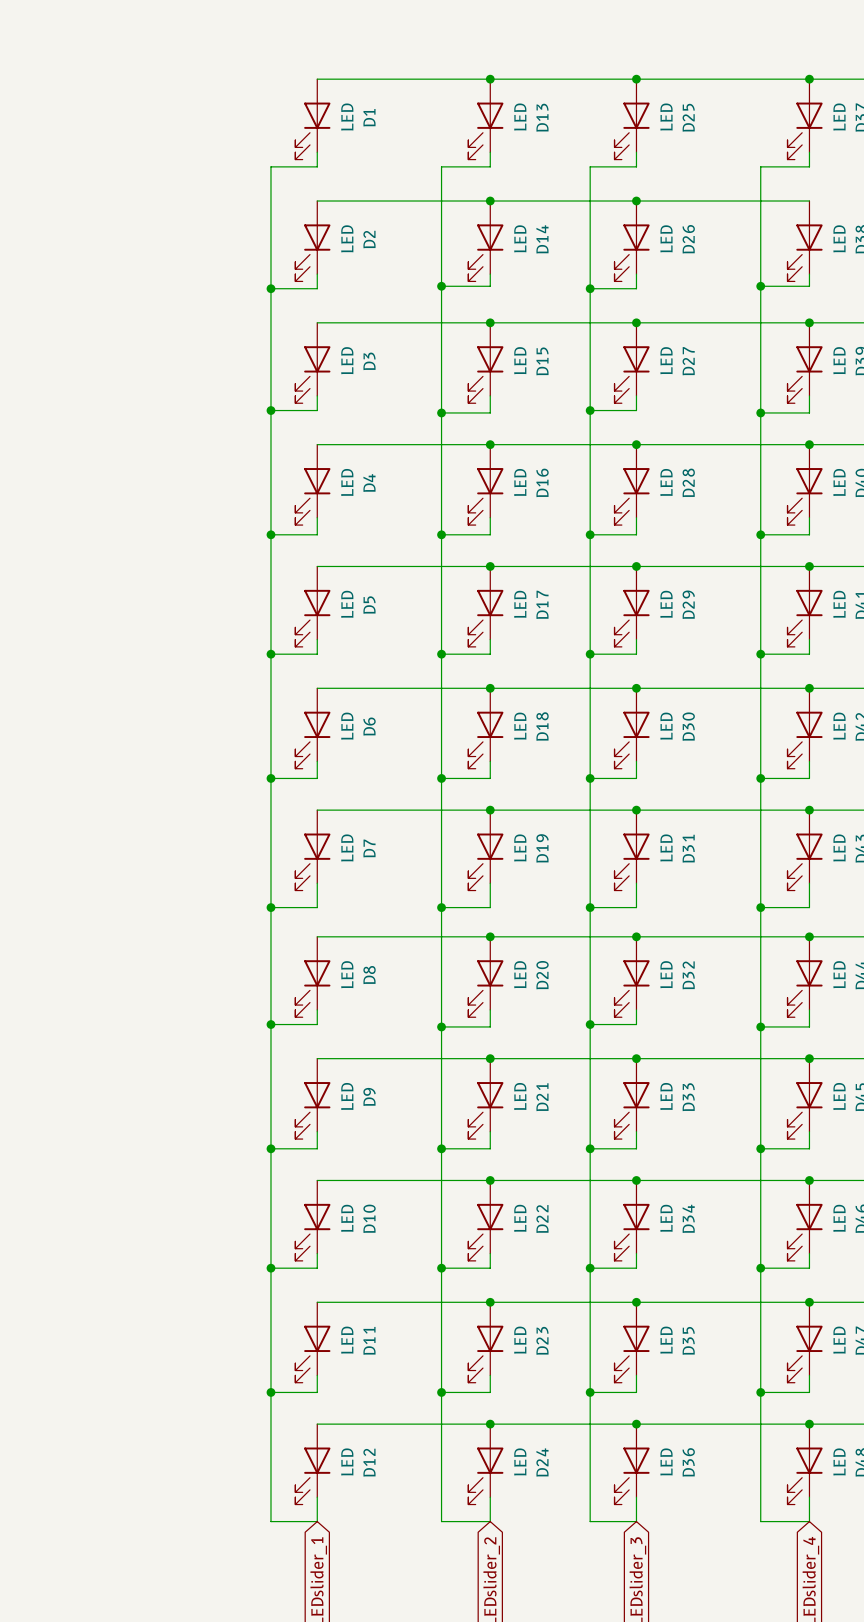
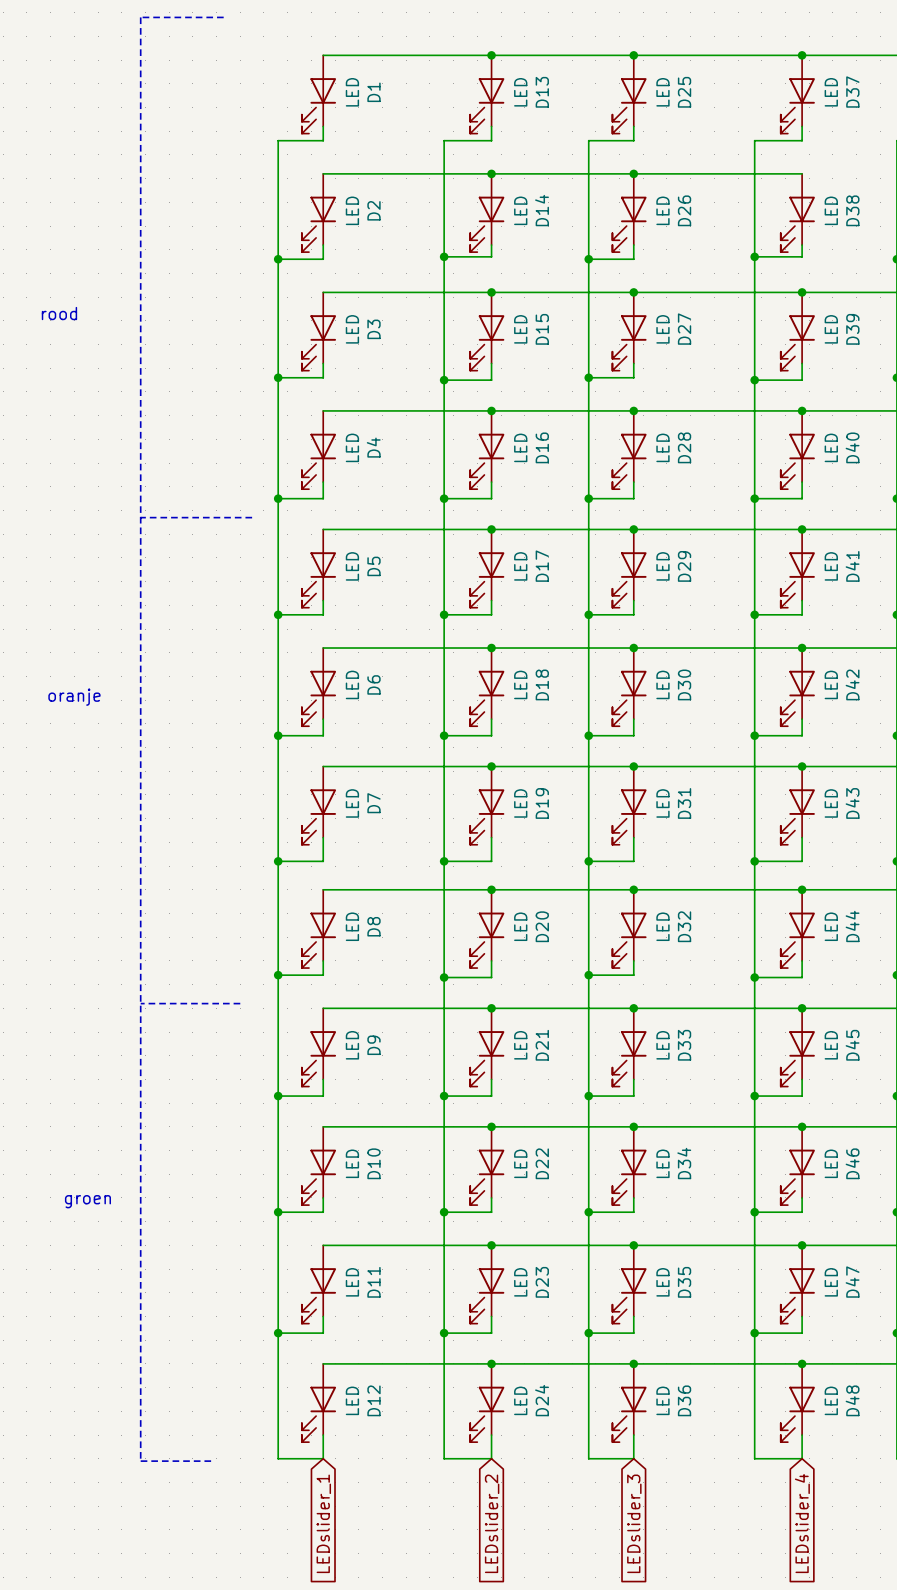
line: none -> (223, 17) (140, 17) (140, 1461) (211, 1461)
text: none -> rood (59, 313)
line: none -> (140, 517) (252, 517)
text: none -> oranje (74, 697)
line: none -> (140, 1003) (240, 1003)
text: none -> groen (87, 1201)

